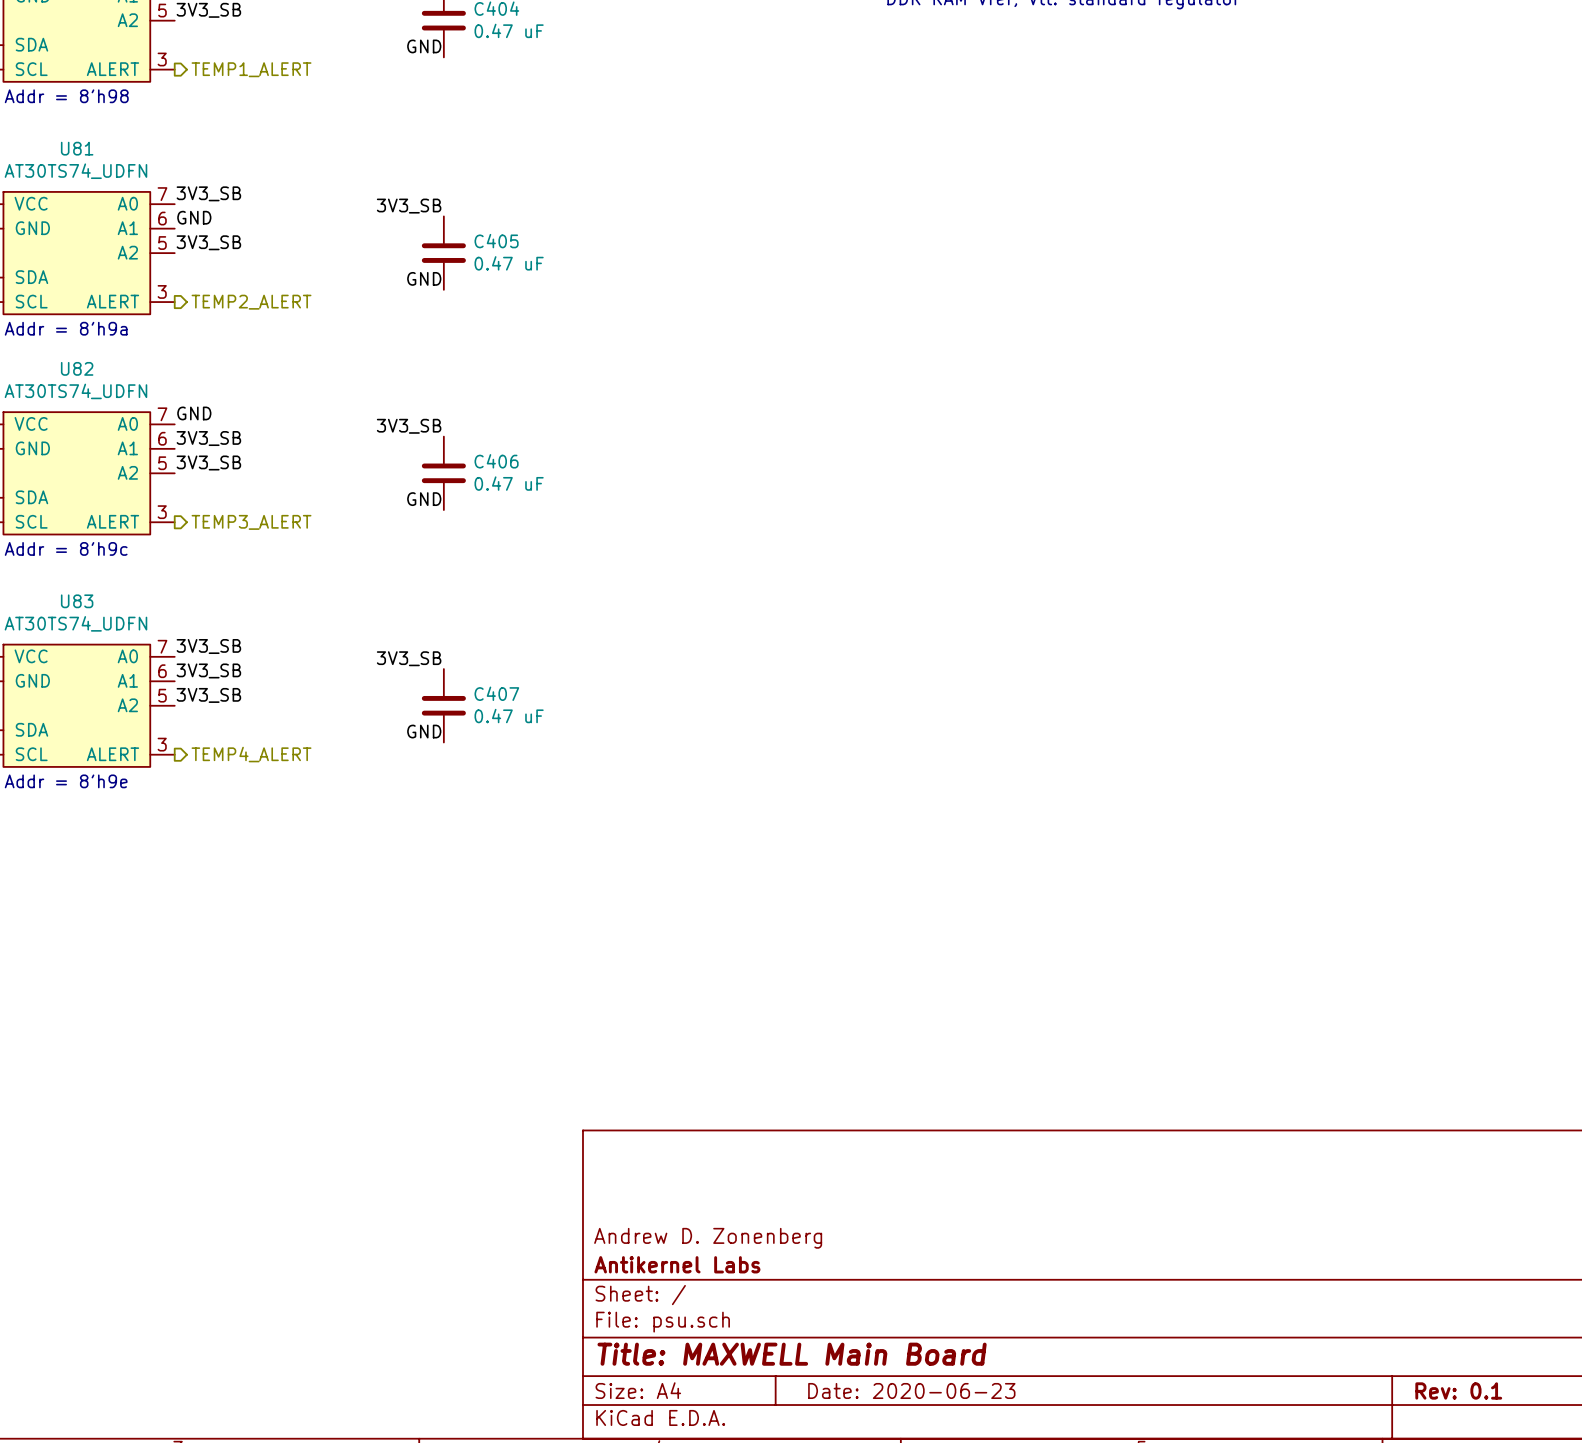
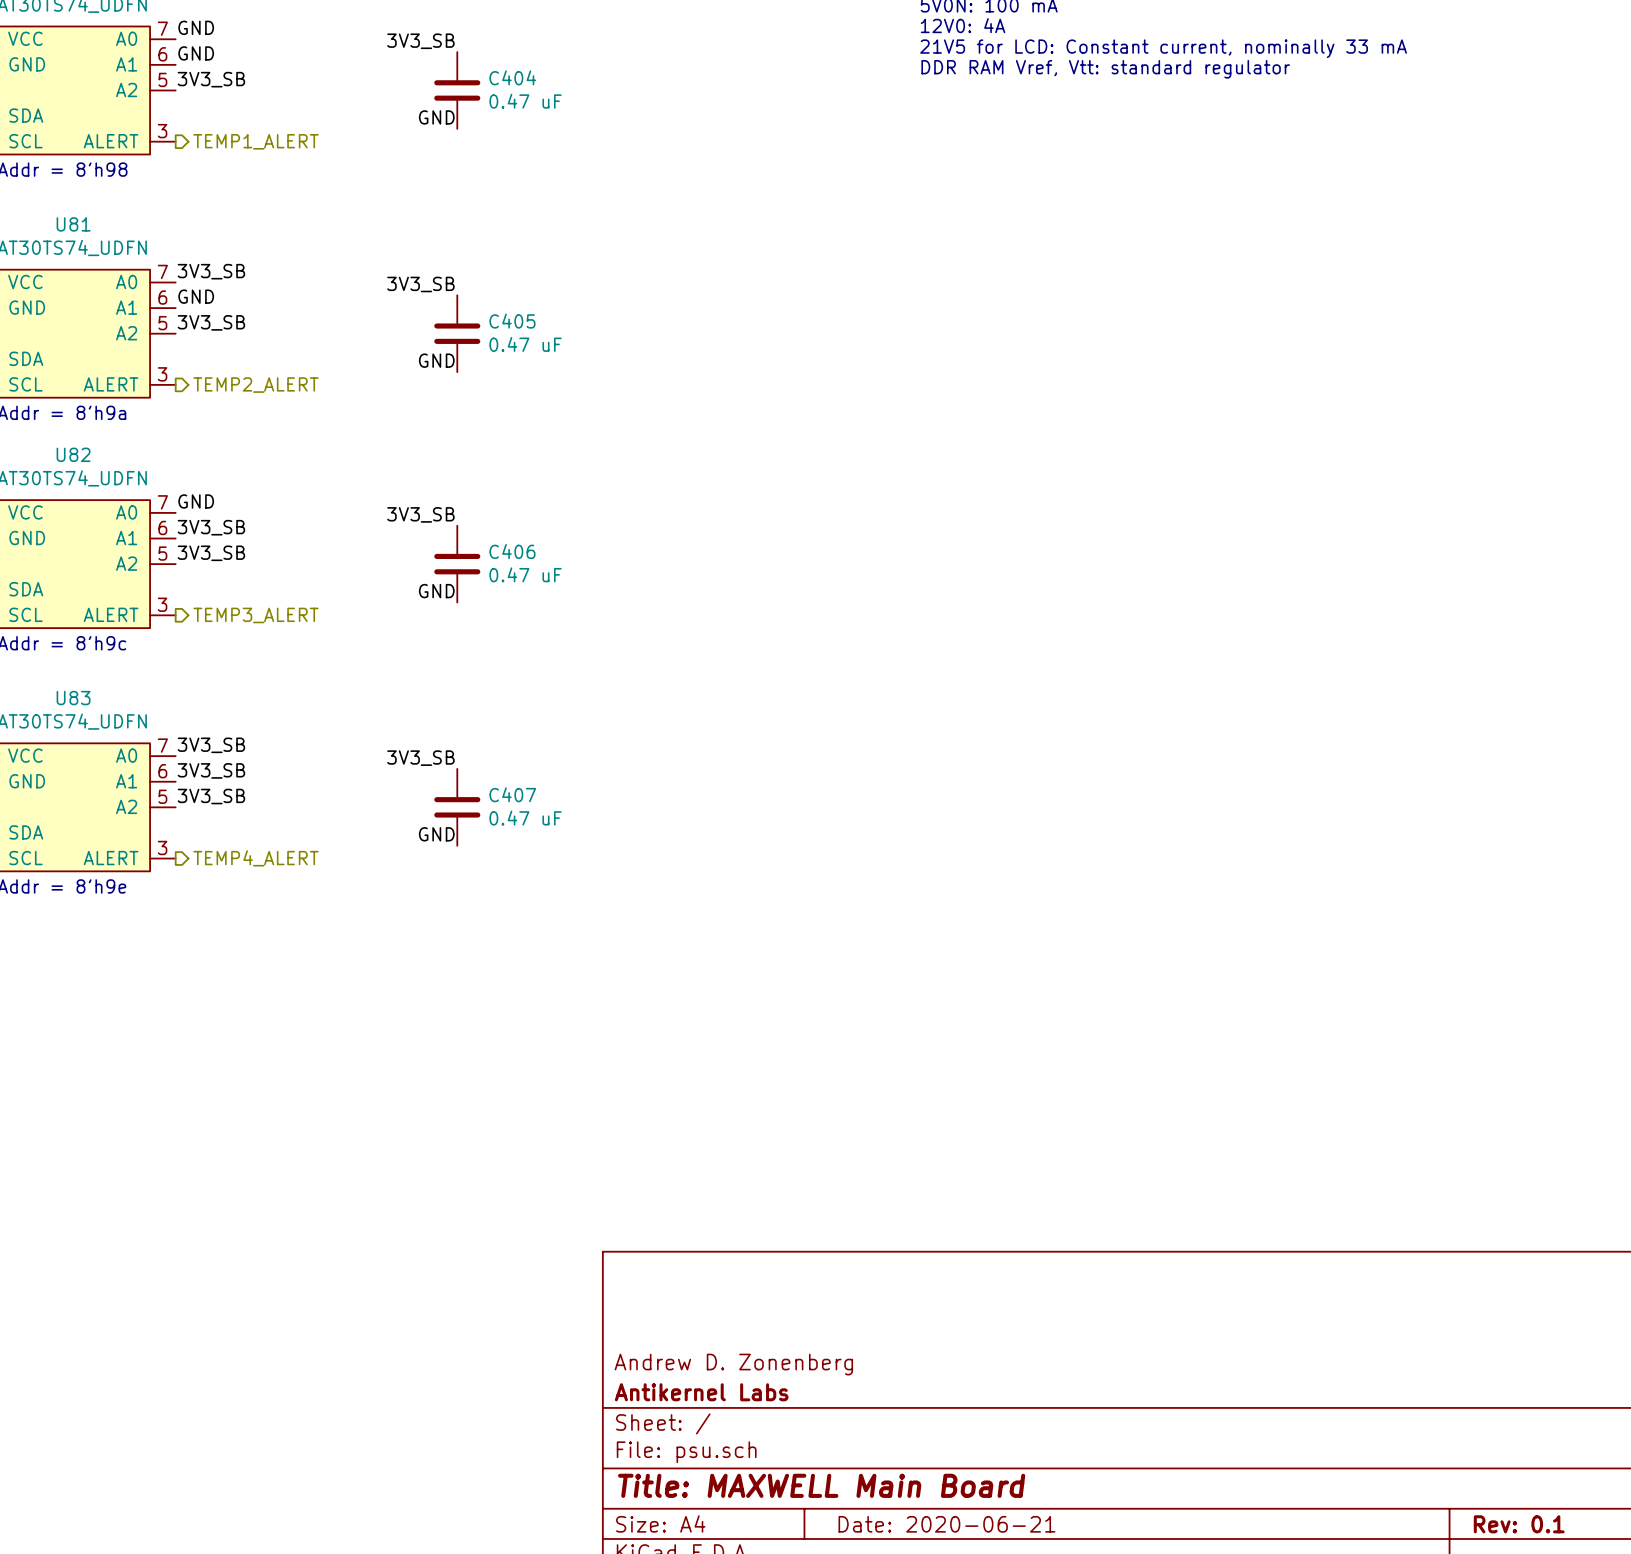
title block: Date: 2020-06-23 (911, 1390) -> Date: 2020-06-21 (946, 1524)

